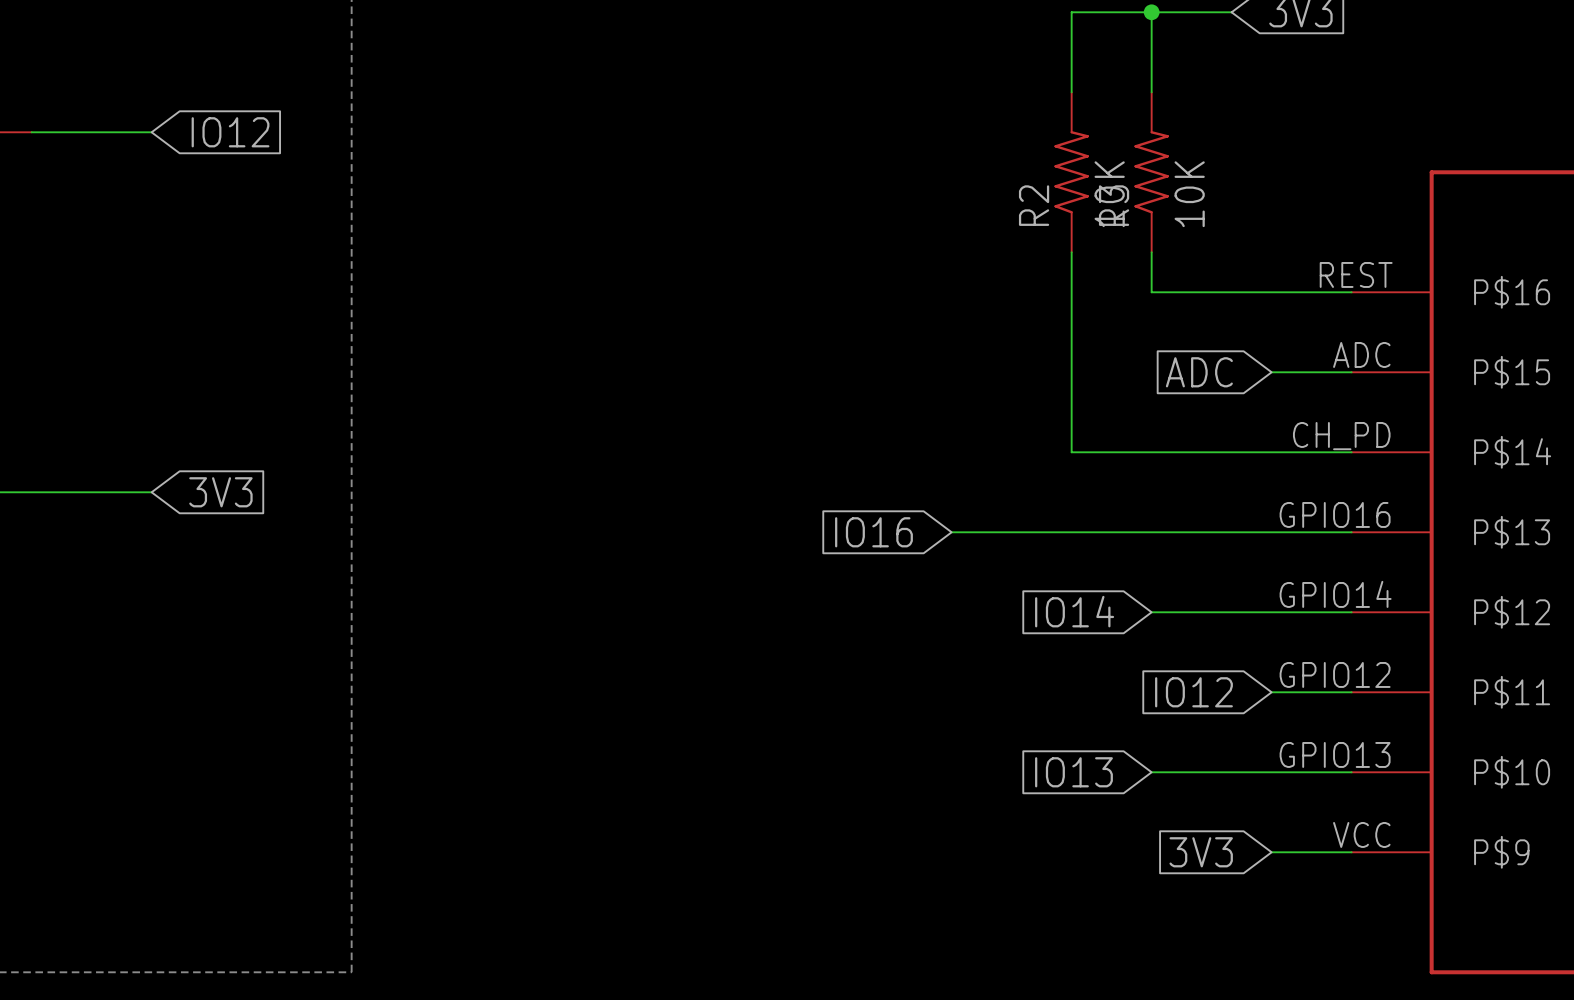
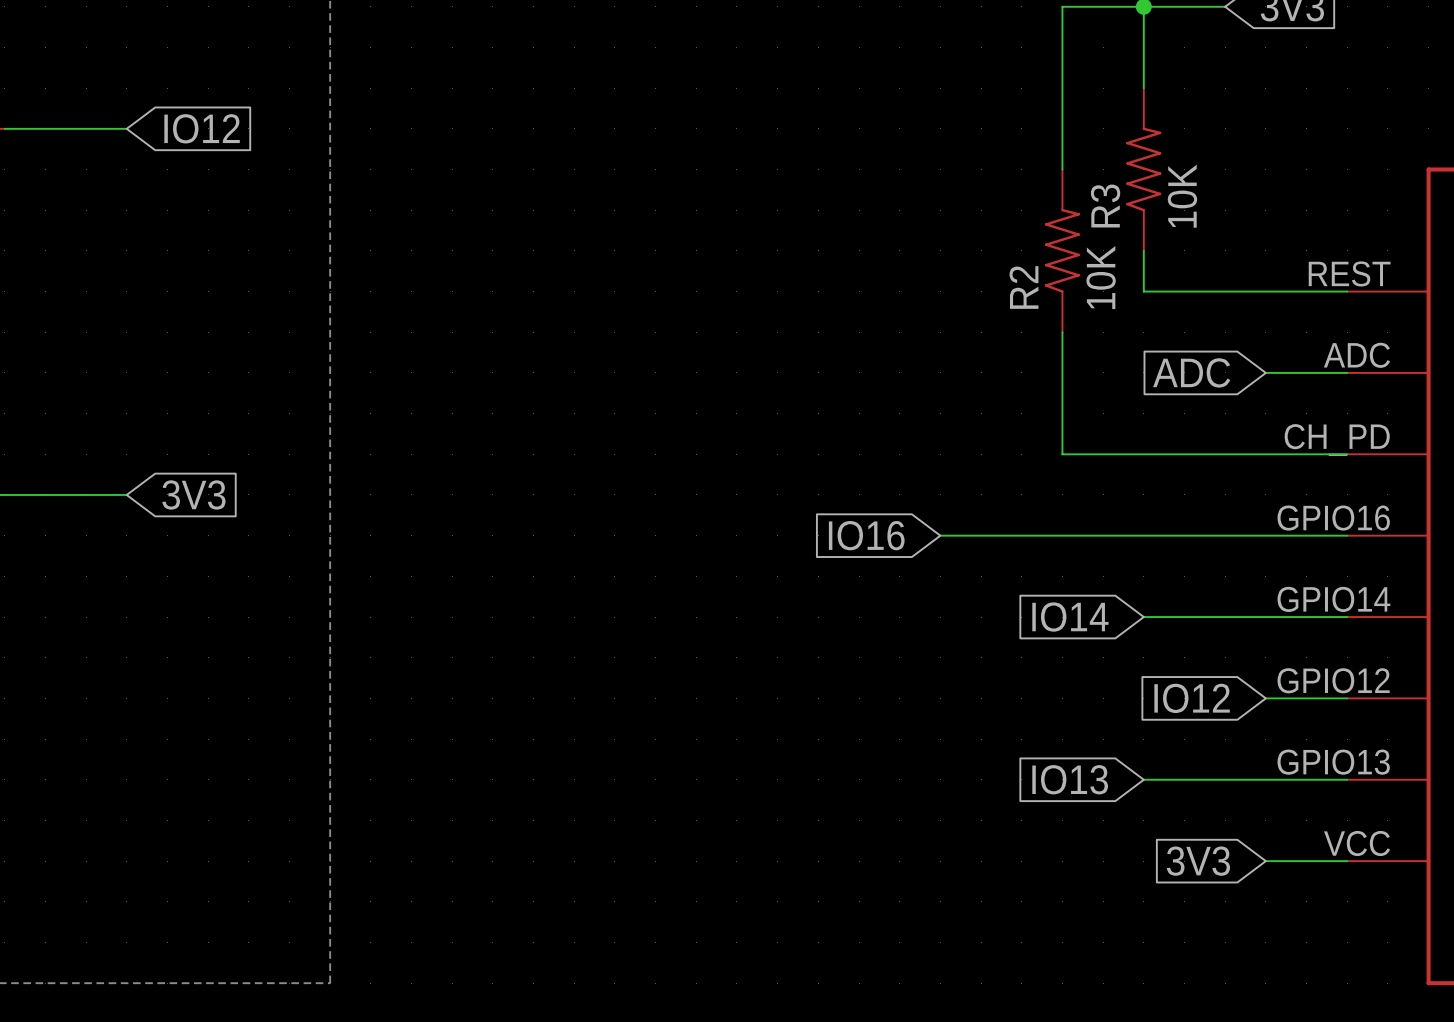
R2 position: (1071, 172) -> (1062, 250)

